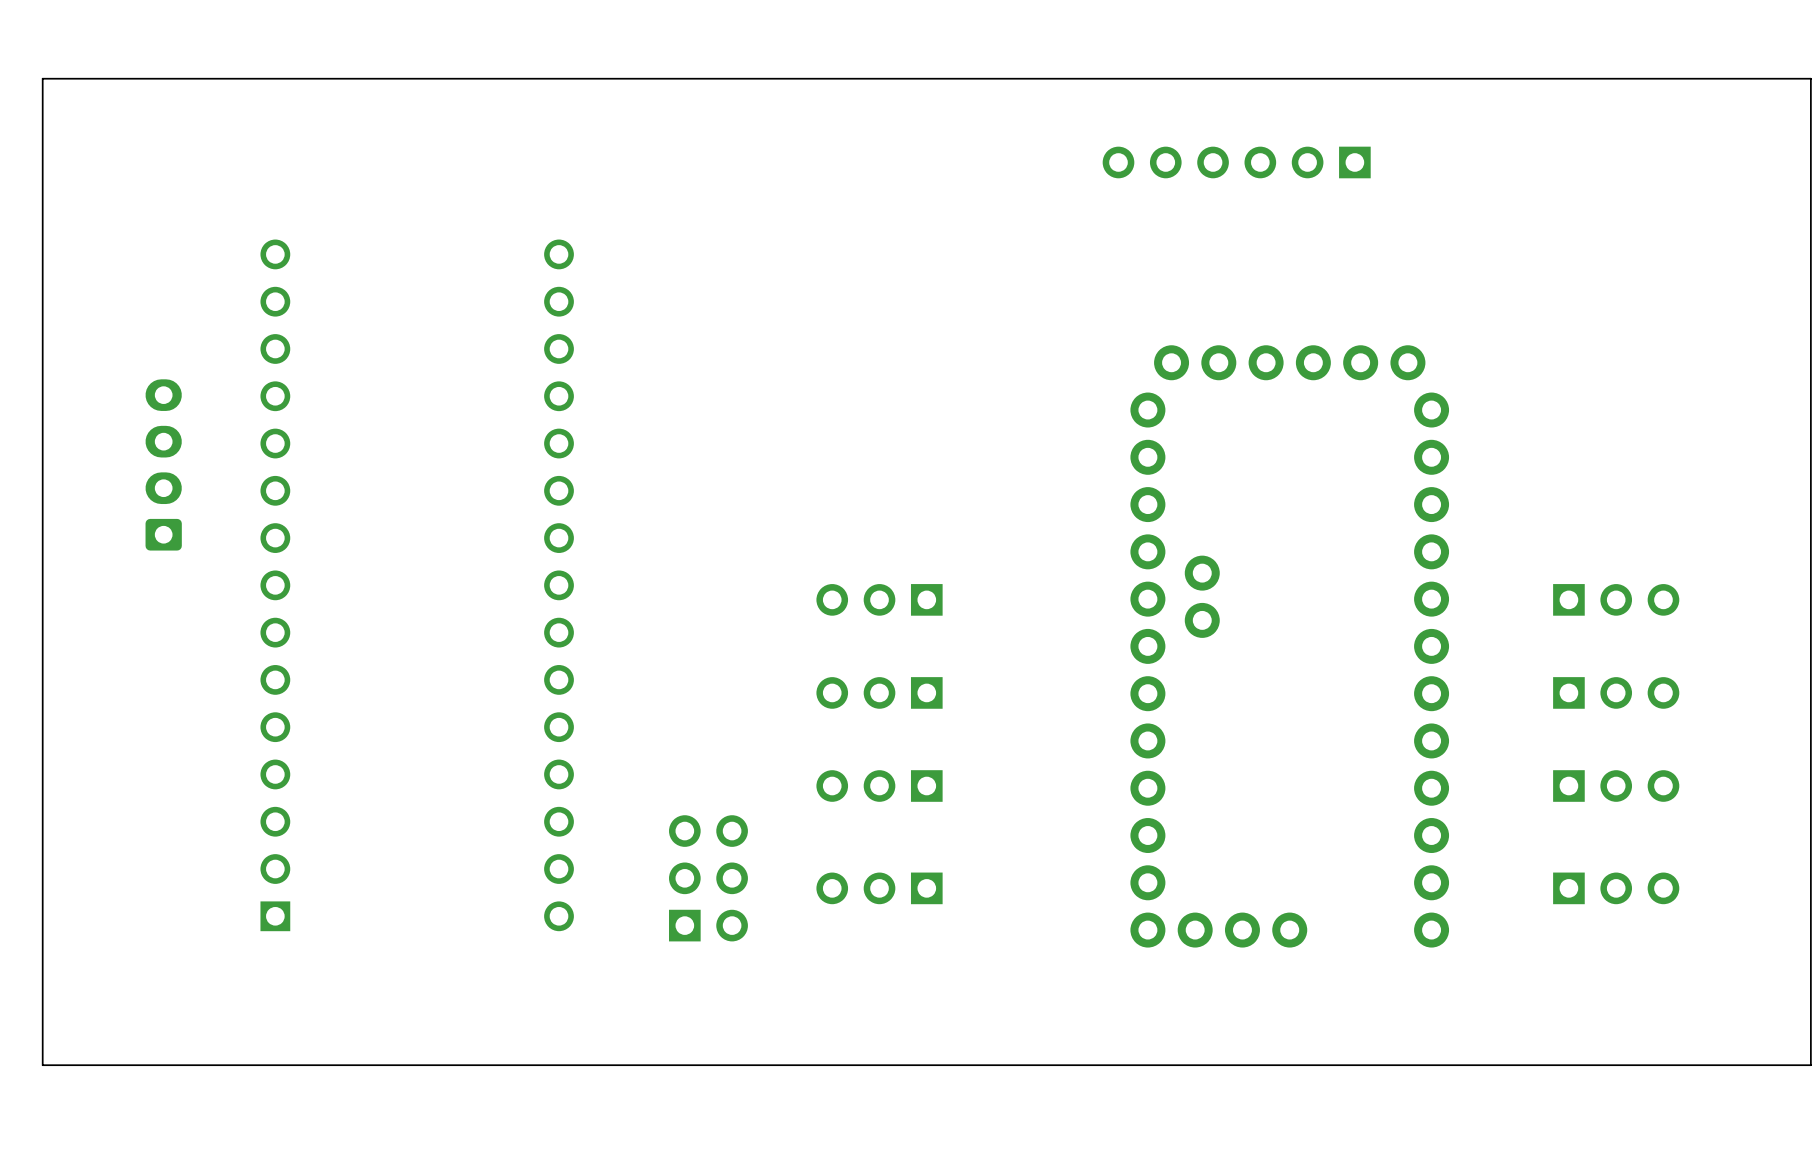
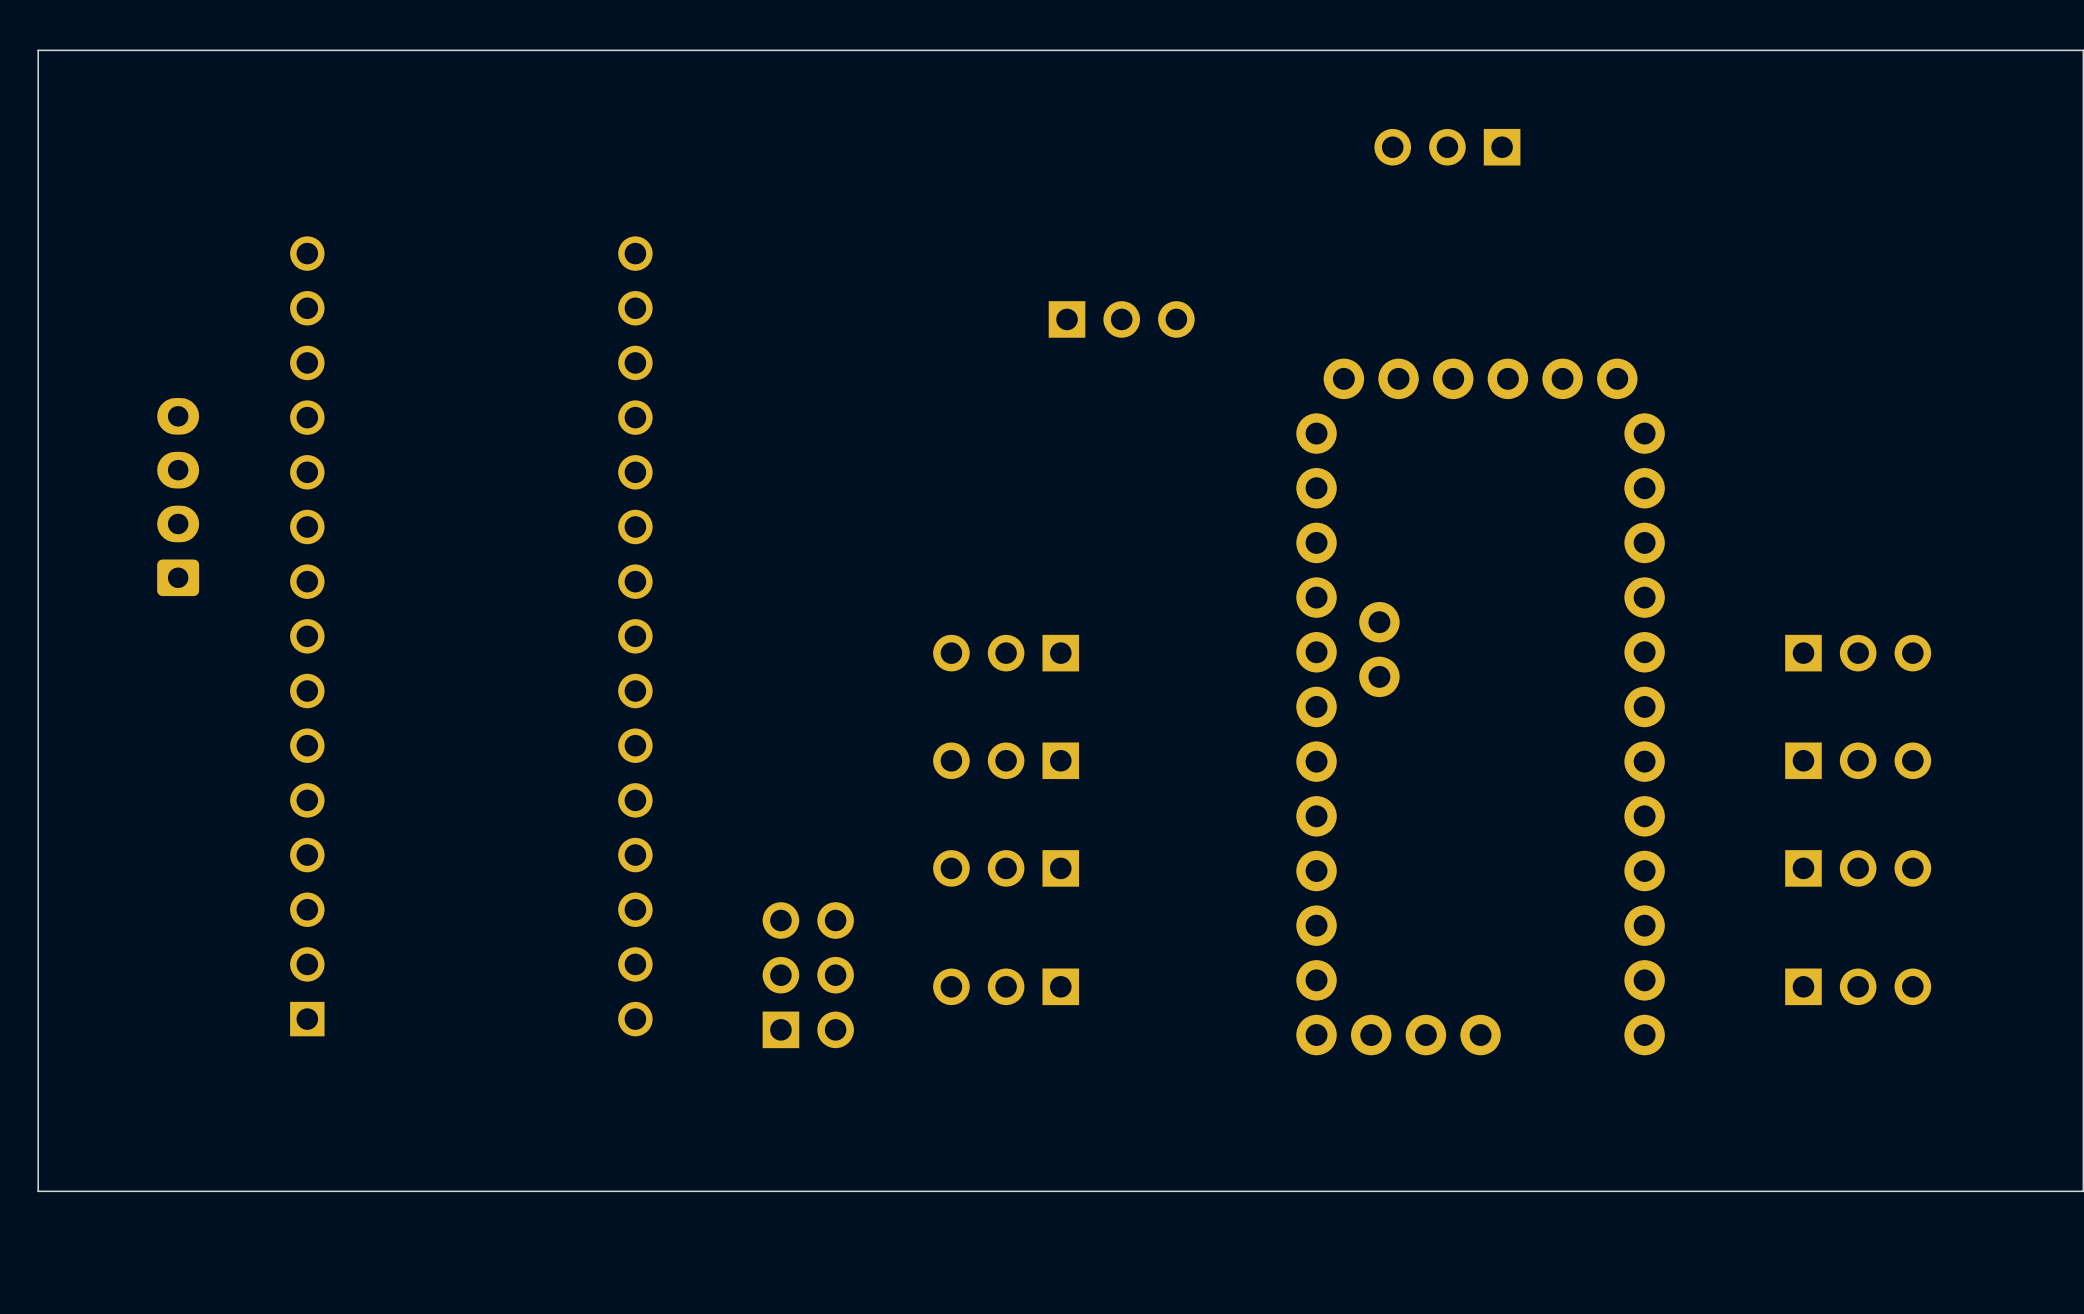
part: (1236, 162) -> none
part: none -> (1447, 147)
part: none -> (1121, 319)

